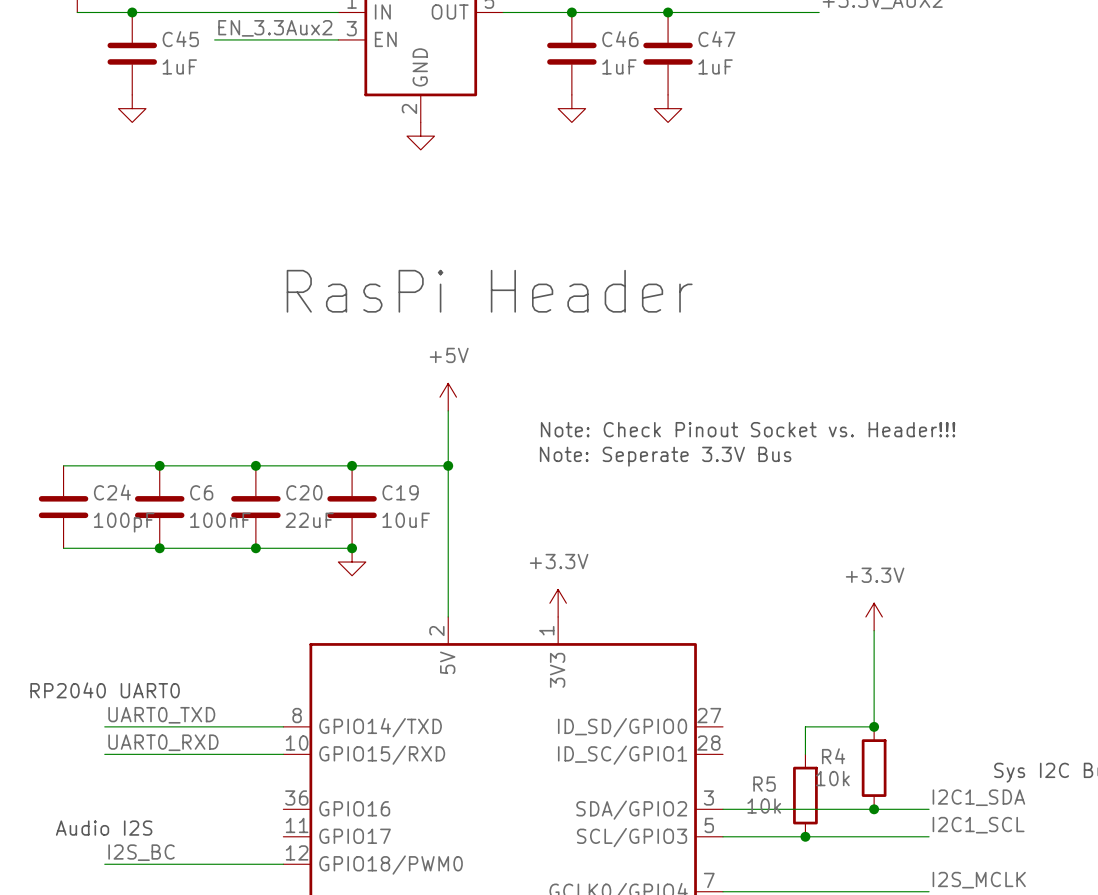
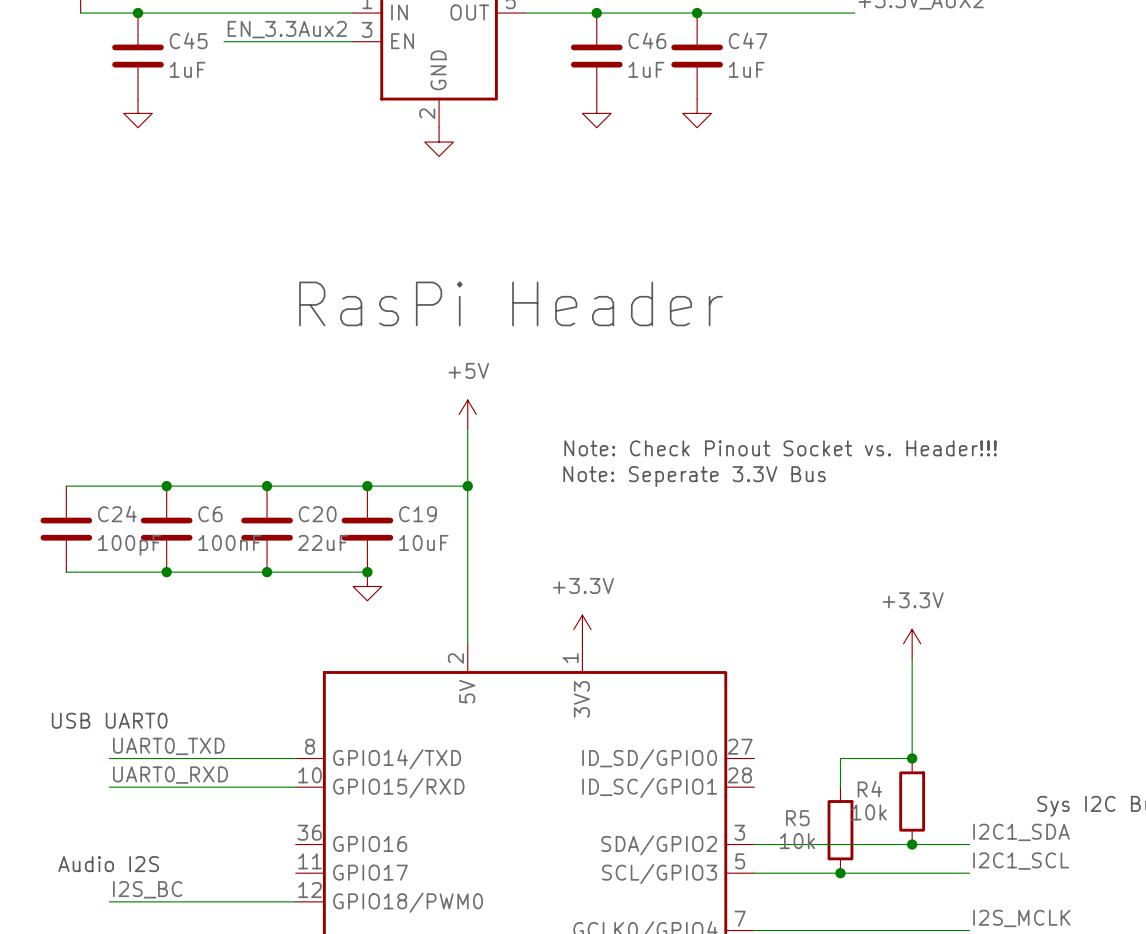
text: RP2040 UART0 (105, 690) -> USB UART0 (109, 720)

